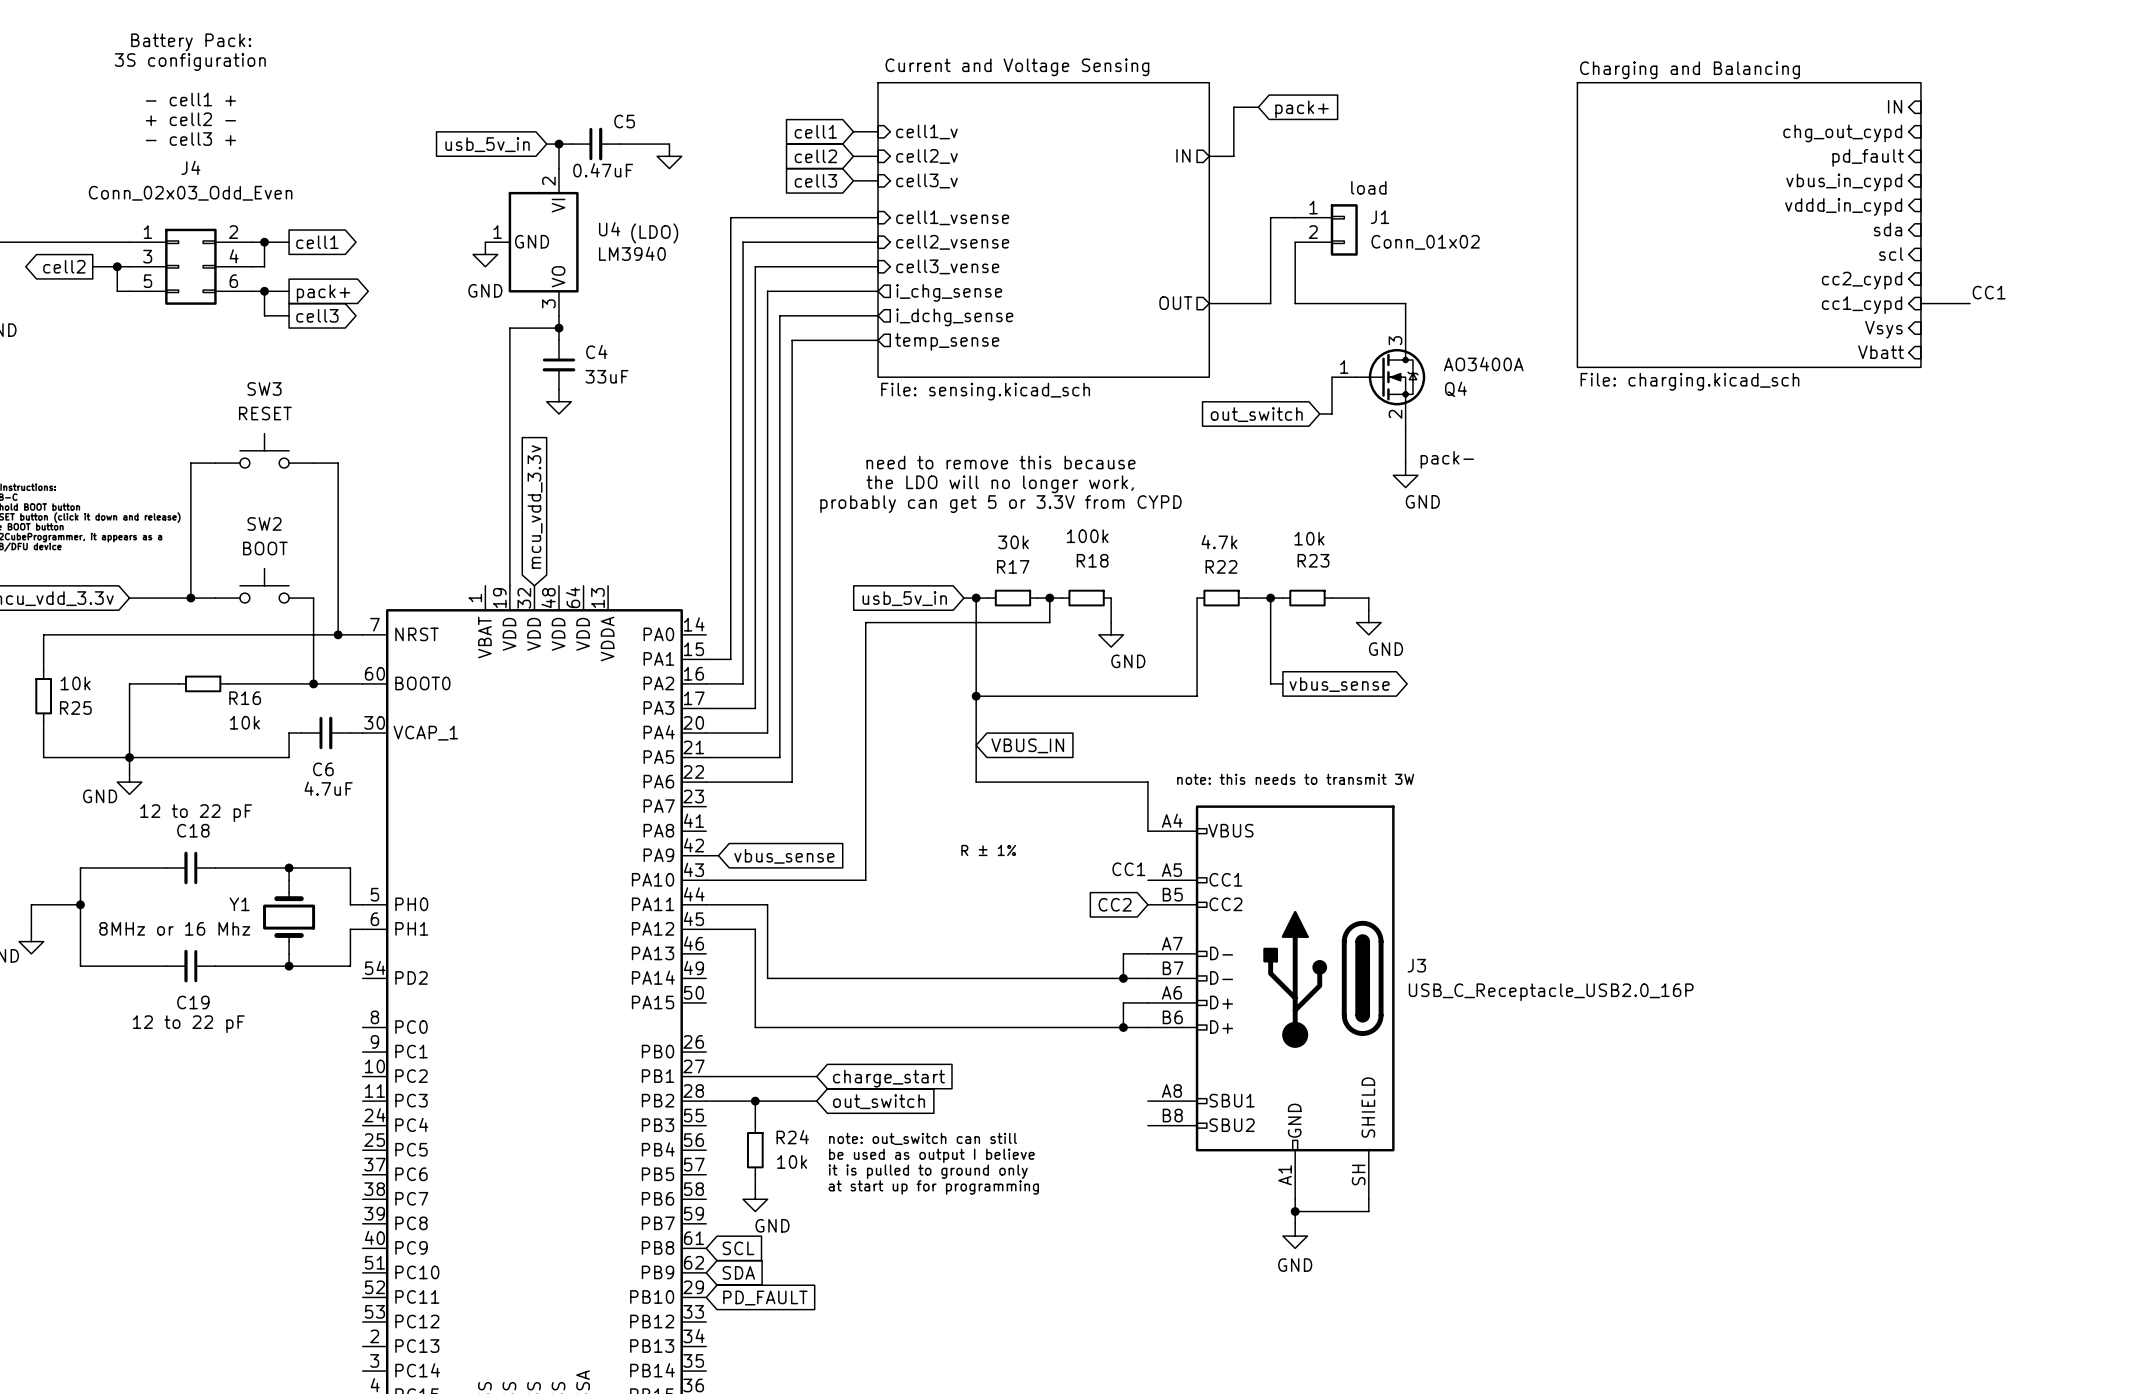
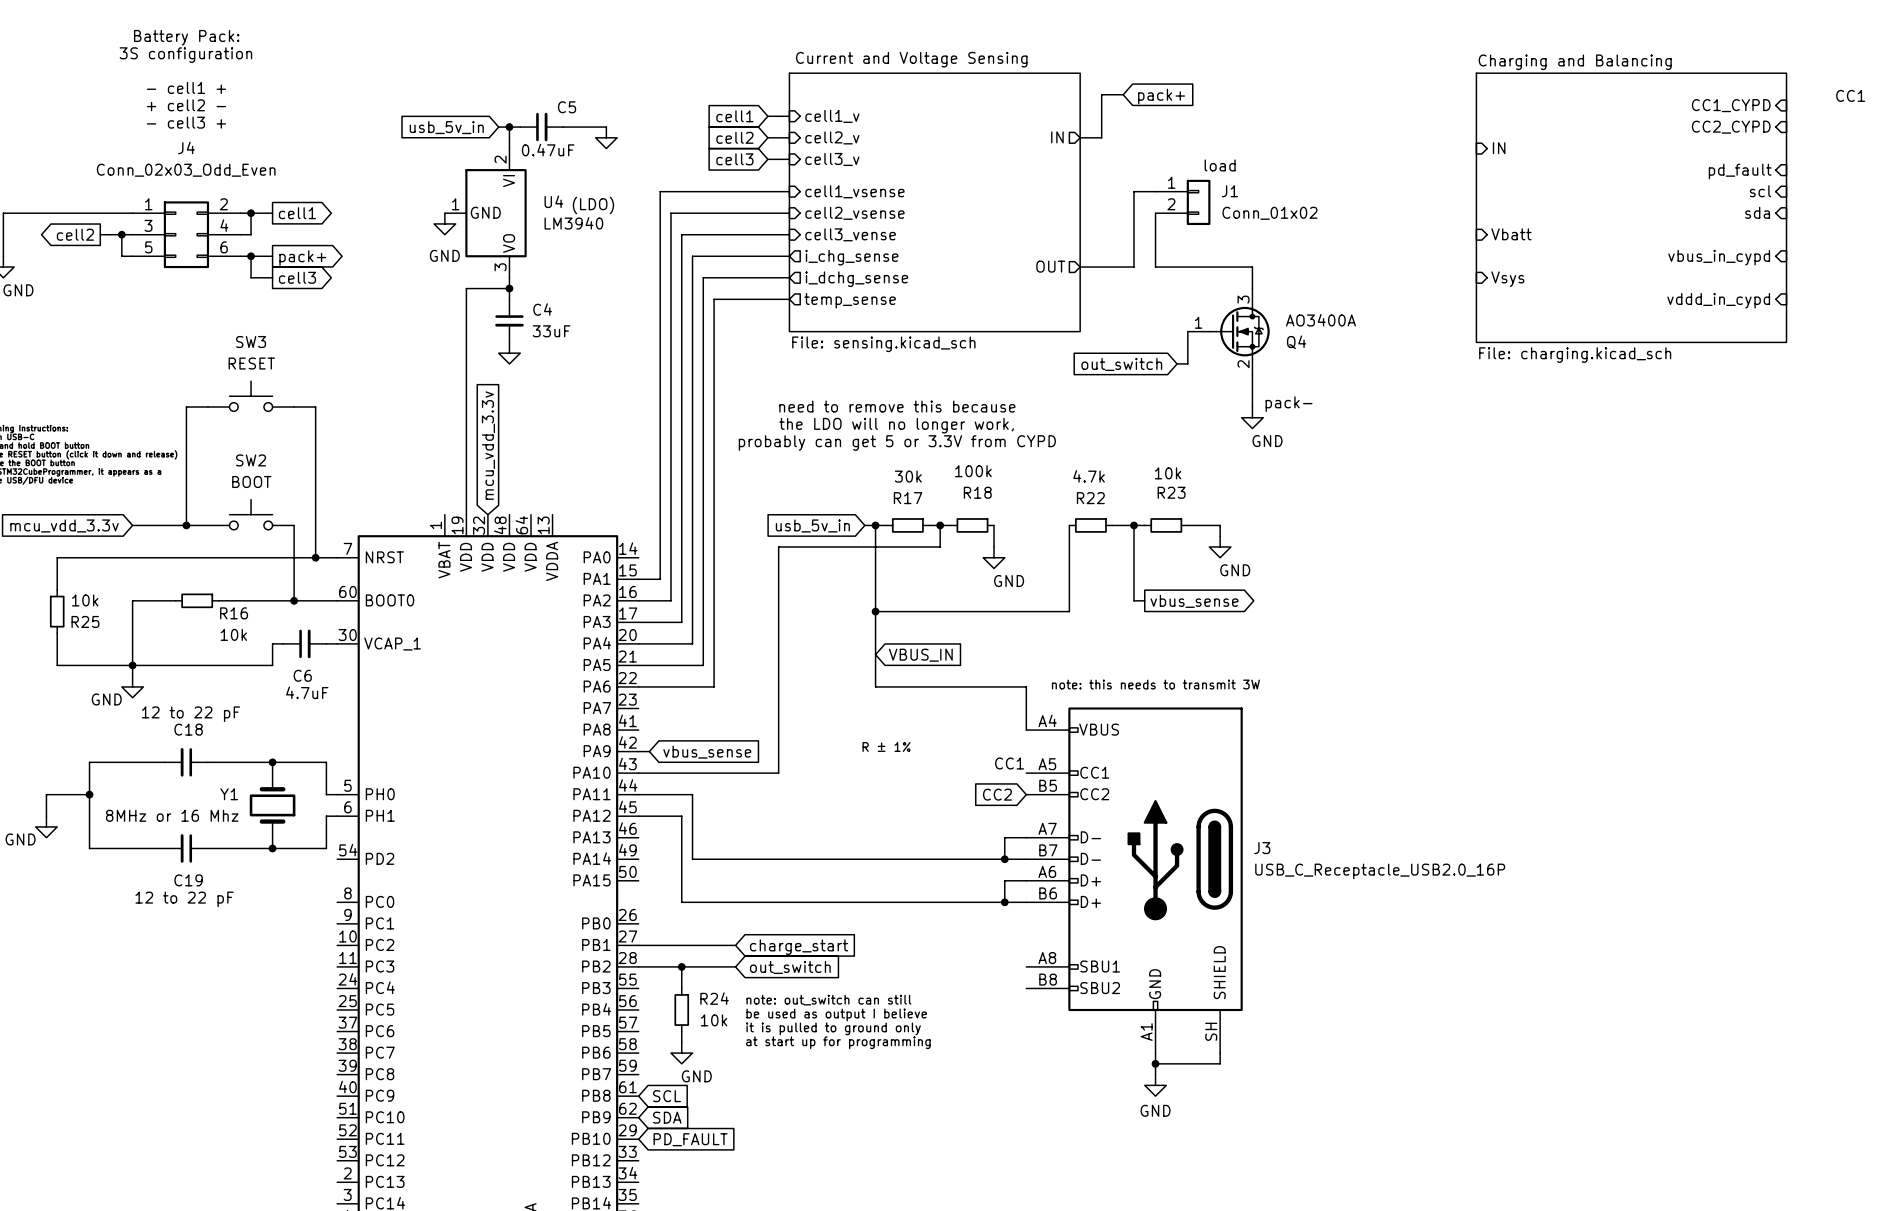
sheet pin rotation: 0° (1895, 106) -> 180° (1499, 148)
sheet pin position: IN (1895, 106) -> IN (1499, 148)
sheet pin: none -> CC1_CYPD (1731, 105)
sheet pin: chg_out_cypd (1842, 133) -> none
sheet pin: none -> CC2_CYPD (1731, 127)
sheet pin position: pd_fault (1868, 157) -> pd_fault (1740, 171)
sheet pin position: vbus_in_cypd (1844, 182) -> vbus_in_cypd (1719, 257)
sheet pin position: vddd_in_cypd (1843, 206) -> vddd_in_cypd (1718, 300)
sheet Charging and Balancing: File: charging.kicad_sch (1749, 225) -> none
sheet pin position: sda (1888, 229) -> sda (1757, 212)
sheet Charging and Balancing: none -> File: charging.kicad_sch (1631, 207)
sheet pin position: scl (1891, 254) -> scl (1760, 191)
sheet pin: none -> Vbatt (1511, 234)
sheet pin: cc2_cypd (1862, 280) -> none
label position: CC1 (1989, 292) -> CC1 (1850, 95)
wire: (1920, 303) (1970, 303) -> none
sheet pin: cc1_cypd (1862, 305) -> none
sheet pin rotation: 0° (1883, 329) -> 180° (1507, 279)
sheet pin position: Vsys (1883, 329) -> Vsys (1507, 279)
sheet pin: Vbatt (1881, 352) -> none

